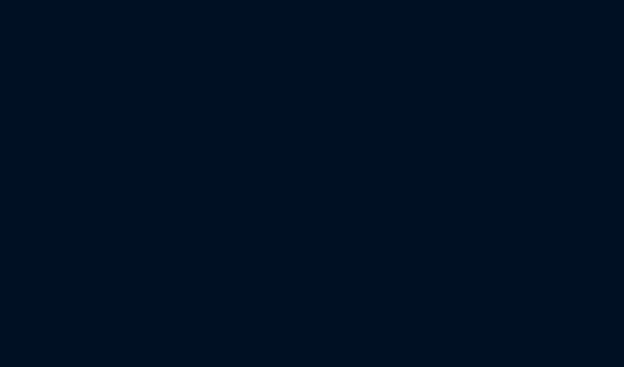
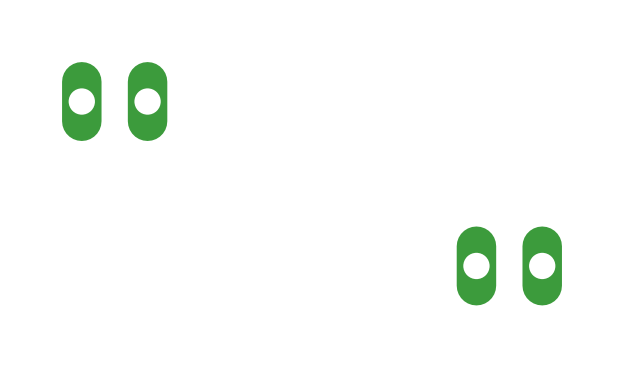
part: none -> (114, 101)
part: none -> (509, 265)

